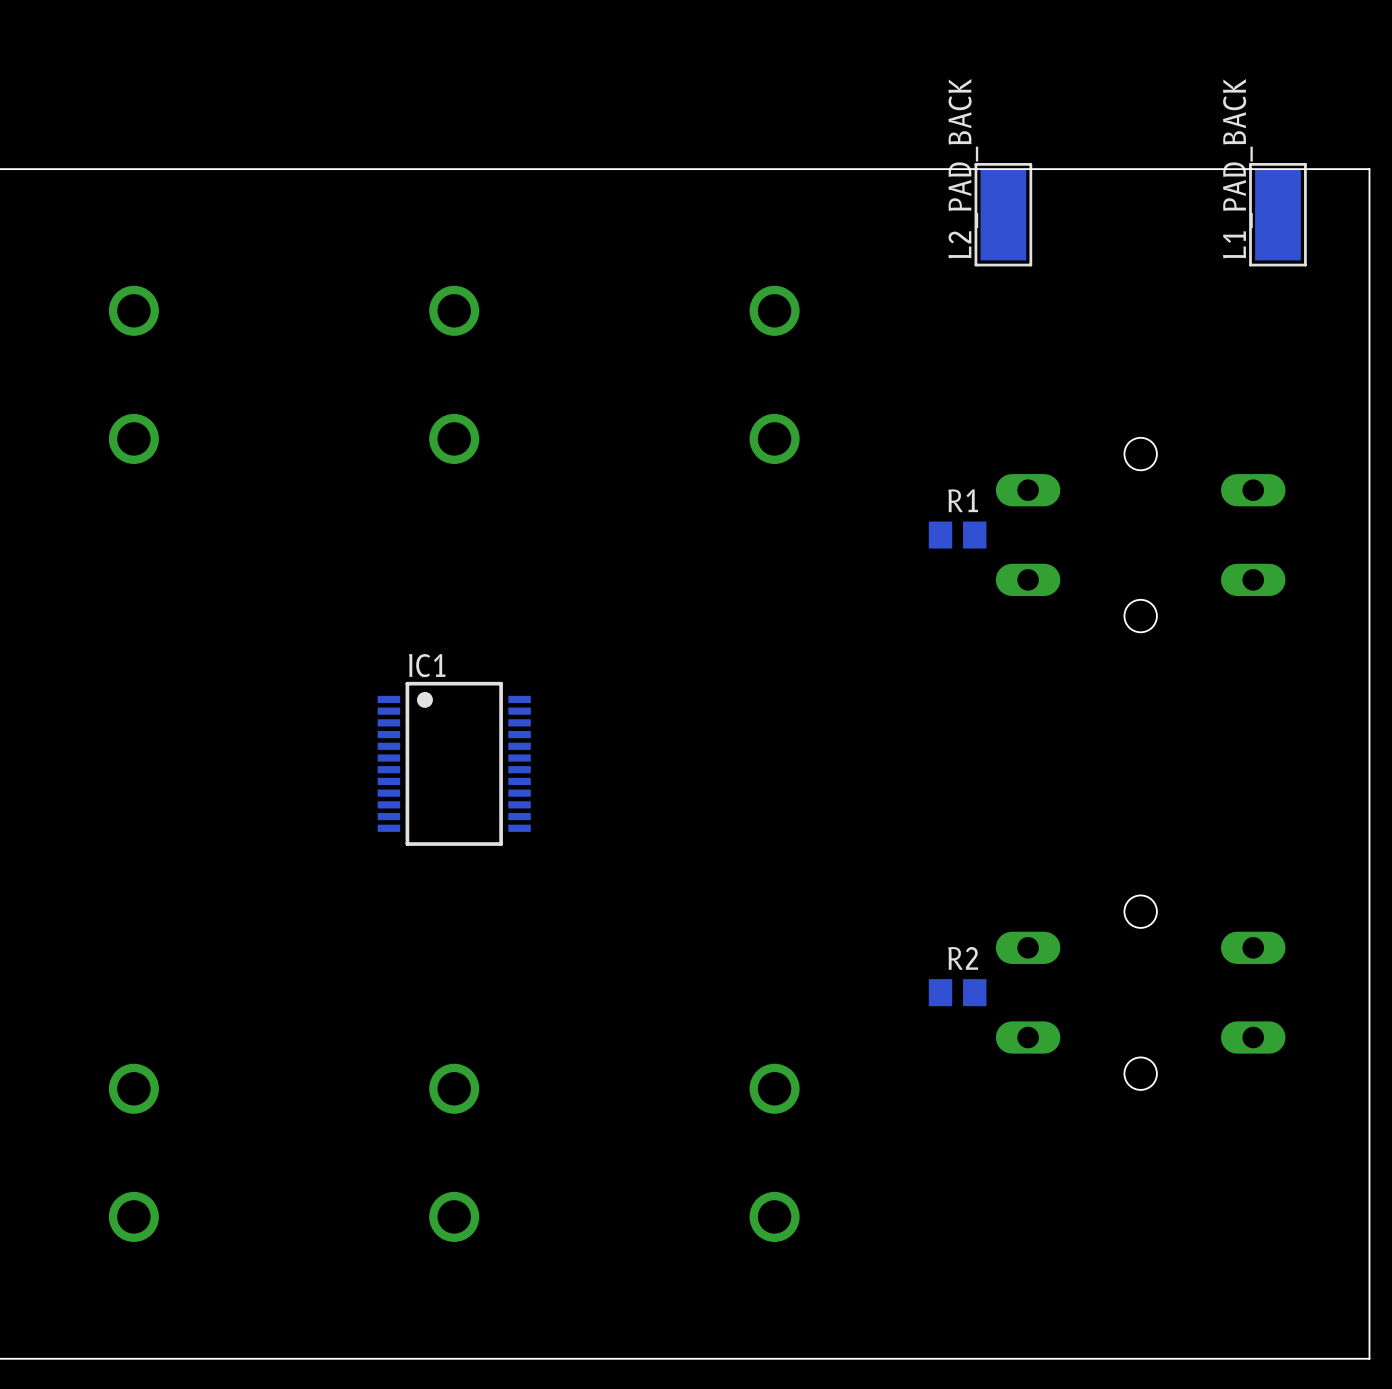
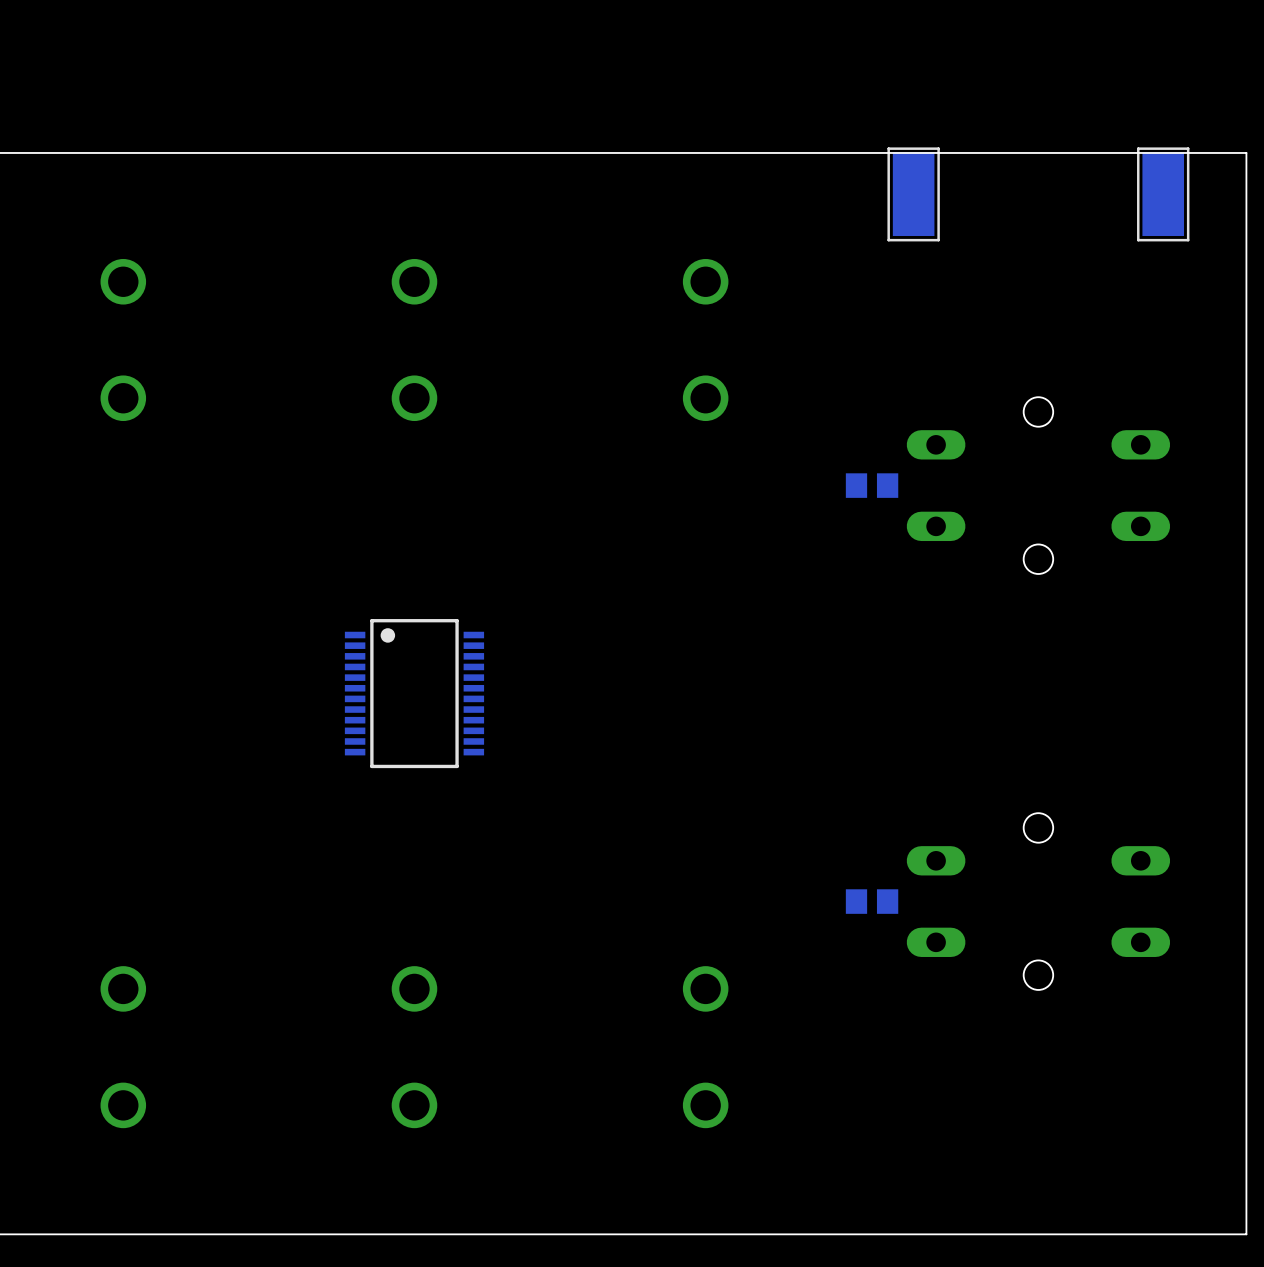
L2_PAD_BACK name: L2_PAD_BACK (963, 168) -> none
L1_PAD_BACK name: L1_PAD_BACK (1237, 168) -> none
R1 name: R1 (963, 500) -> none
IC1 name: IC1 (427, 665) -> none
R2 name: R2 (963, 958) -> none

